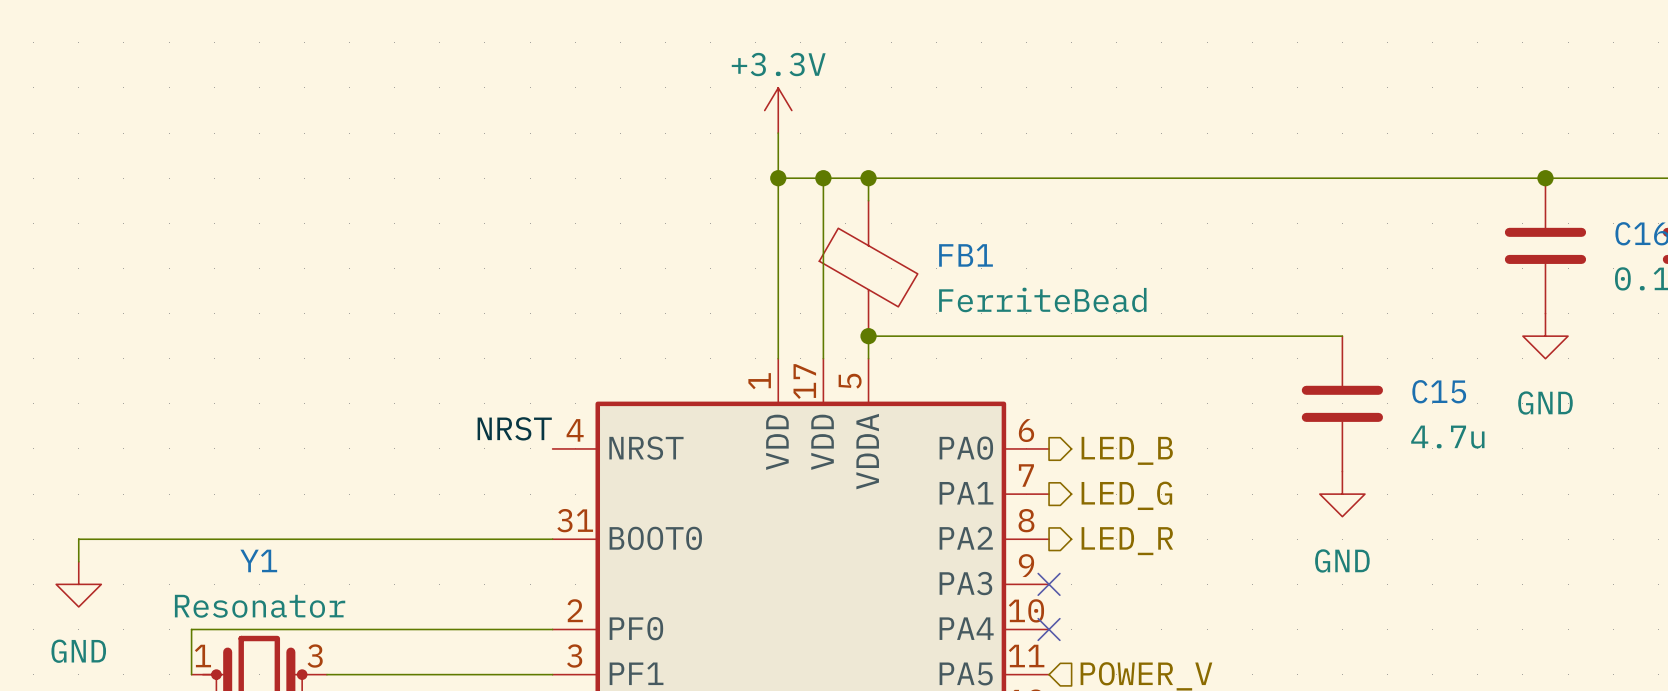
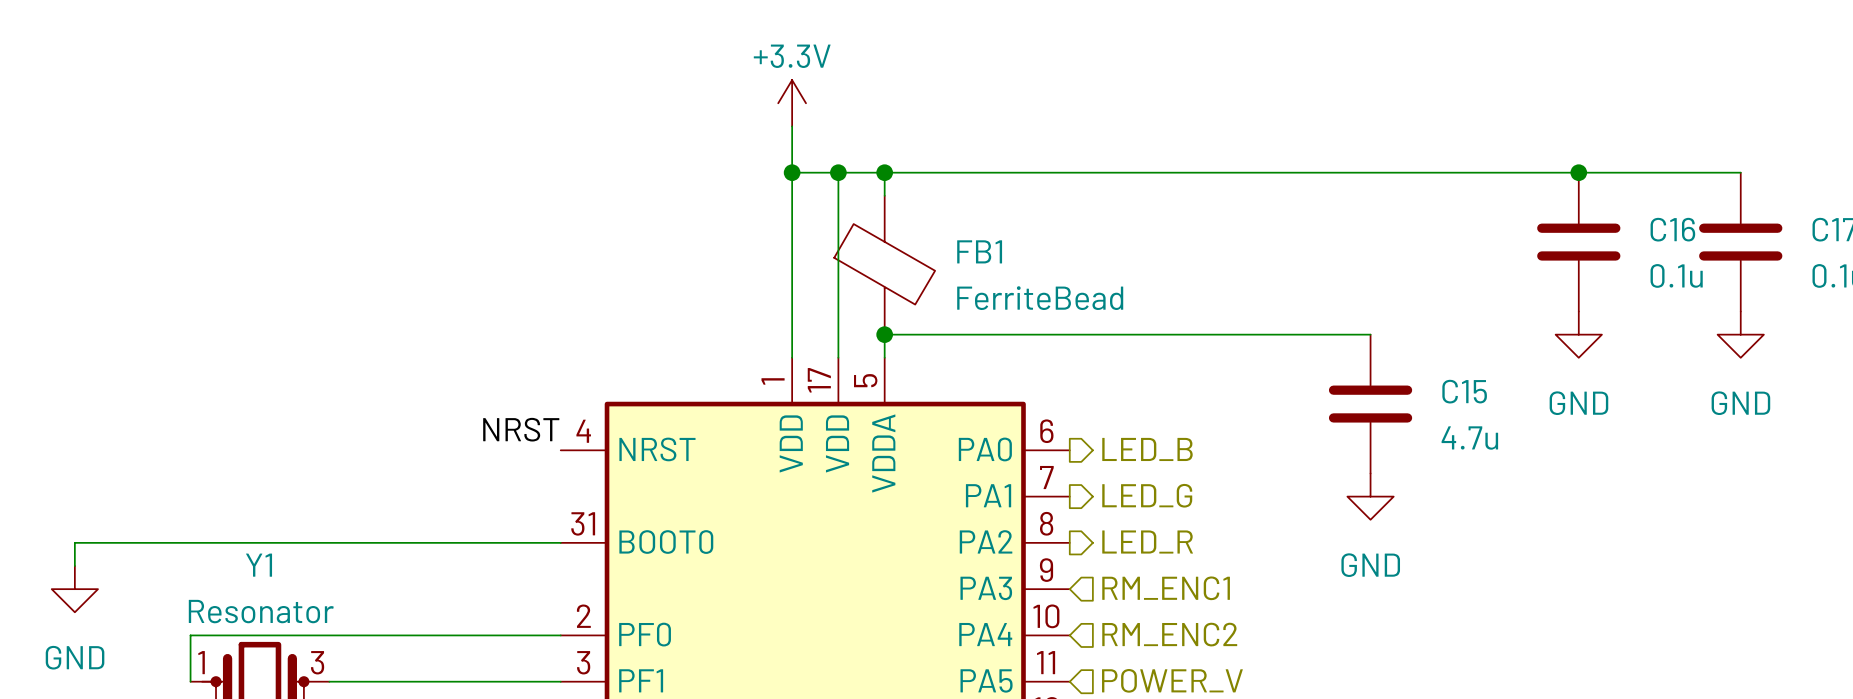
no-connect mark: (1049, 584) -> none
hierarchical label: none -> RM_ENC1 (1166, 588)
no-connect mark: (1049, 629) -> none
hierarchical label: none -> RM_ENC2 (1169, 634)

